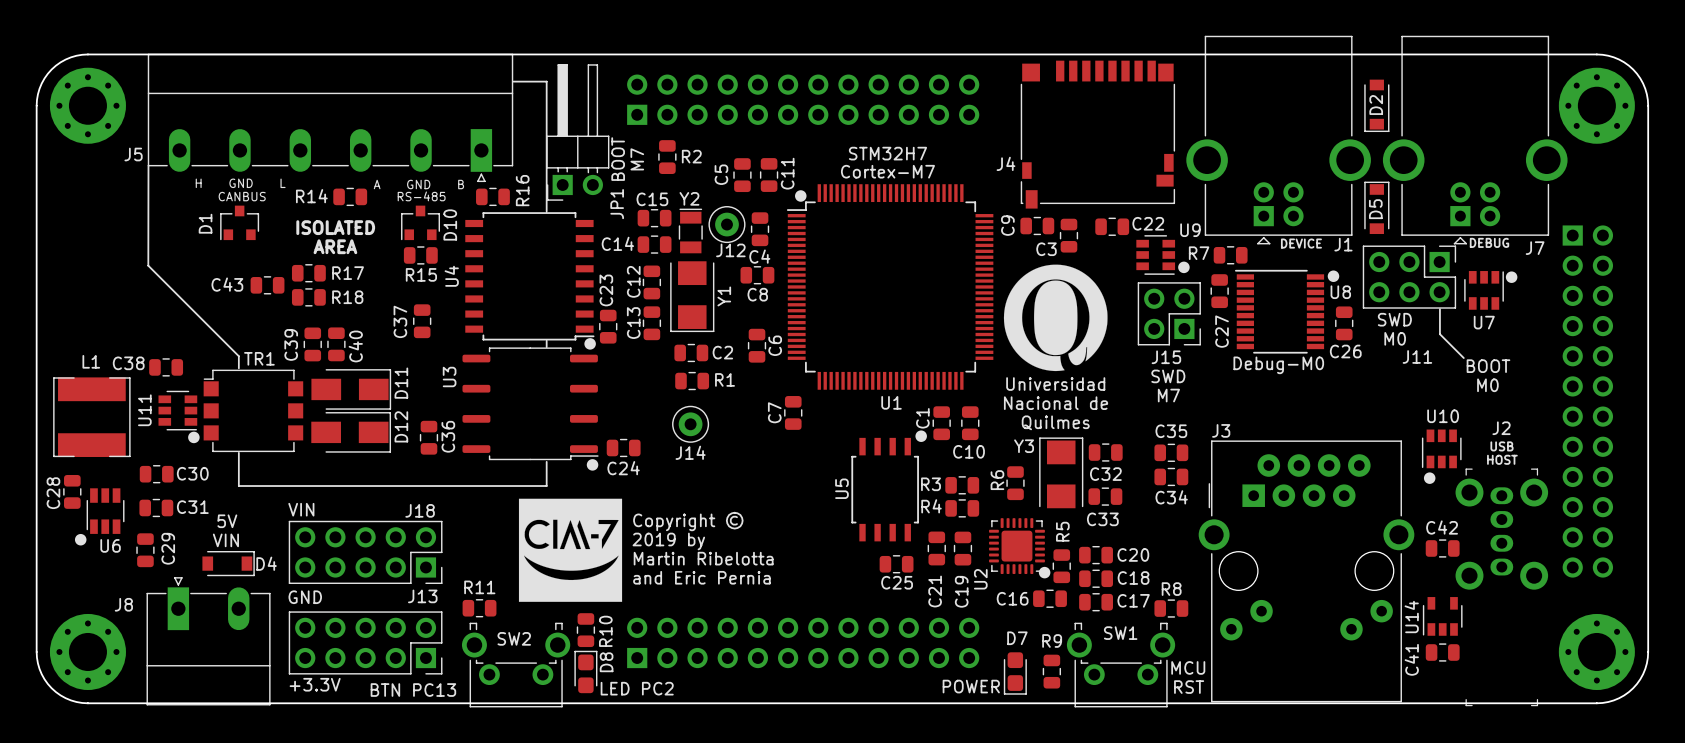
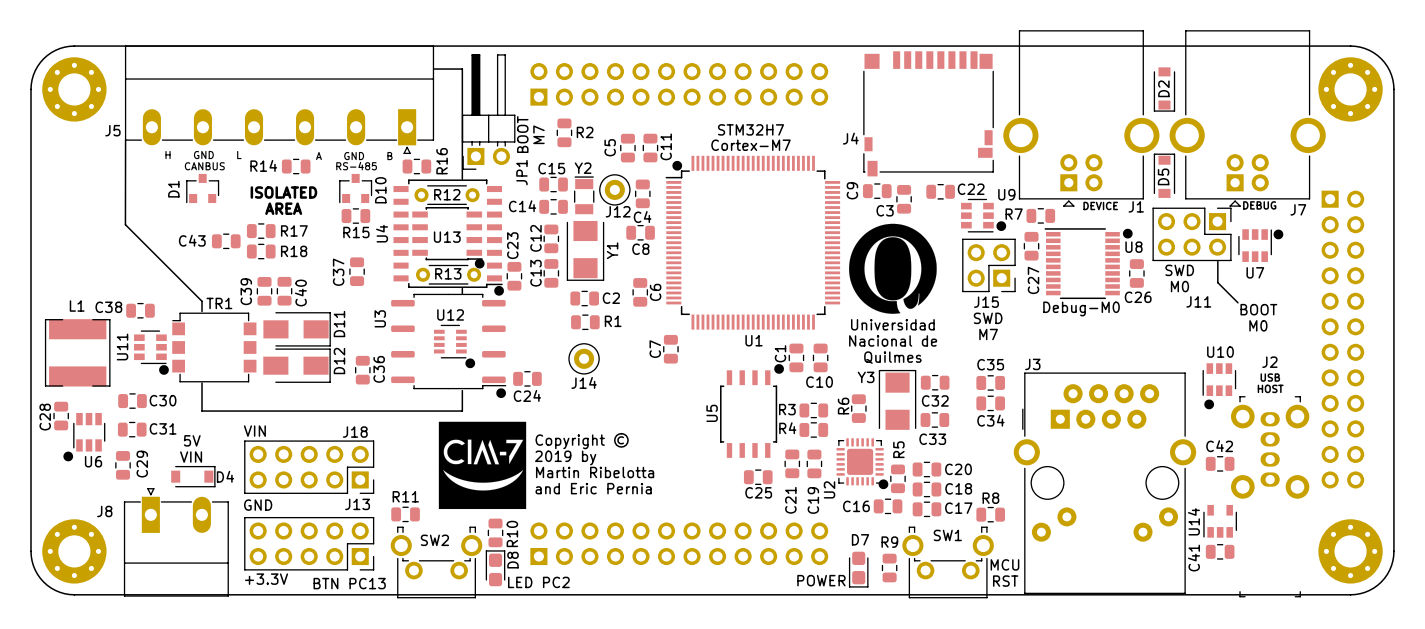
R12: none -> (447, 195)
U13: none -> (447, 233)
drawing: none -> [474, 258, 485, 269]
R13: none -> (448, 274)
U12: none -> (450, 341)
drawing: none -> [465, 358, 476, 369]

